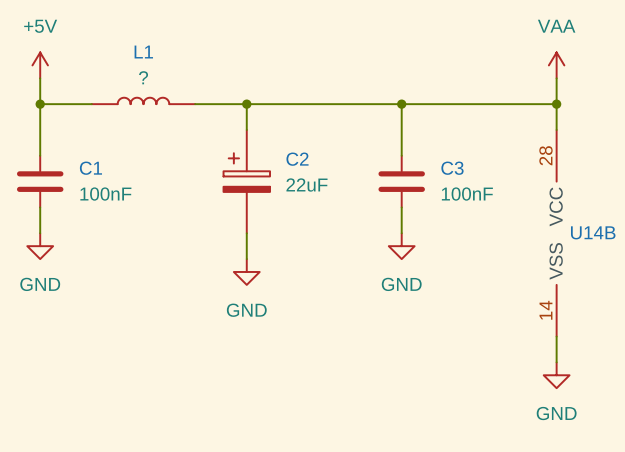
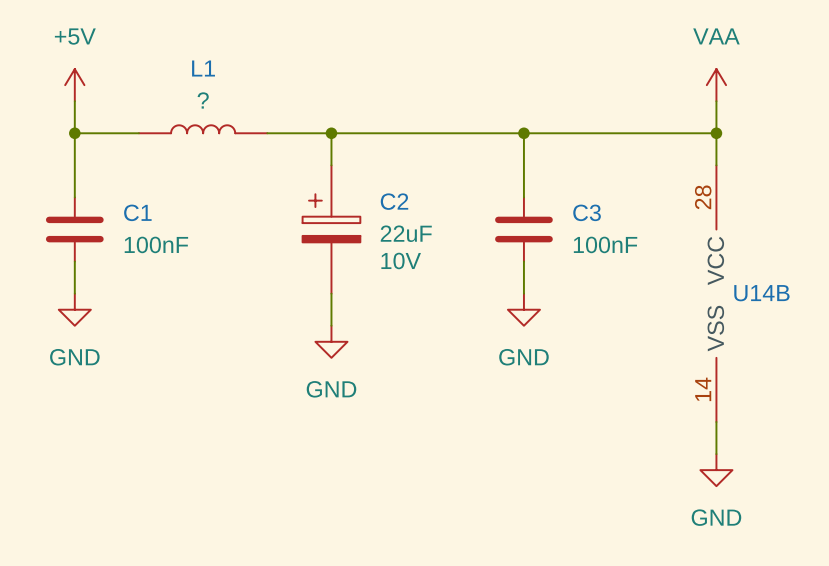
C2 text: none -> 10V (401, 260)

